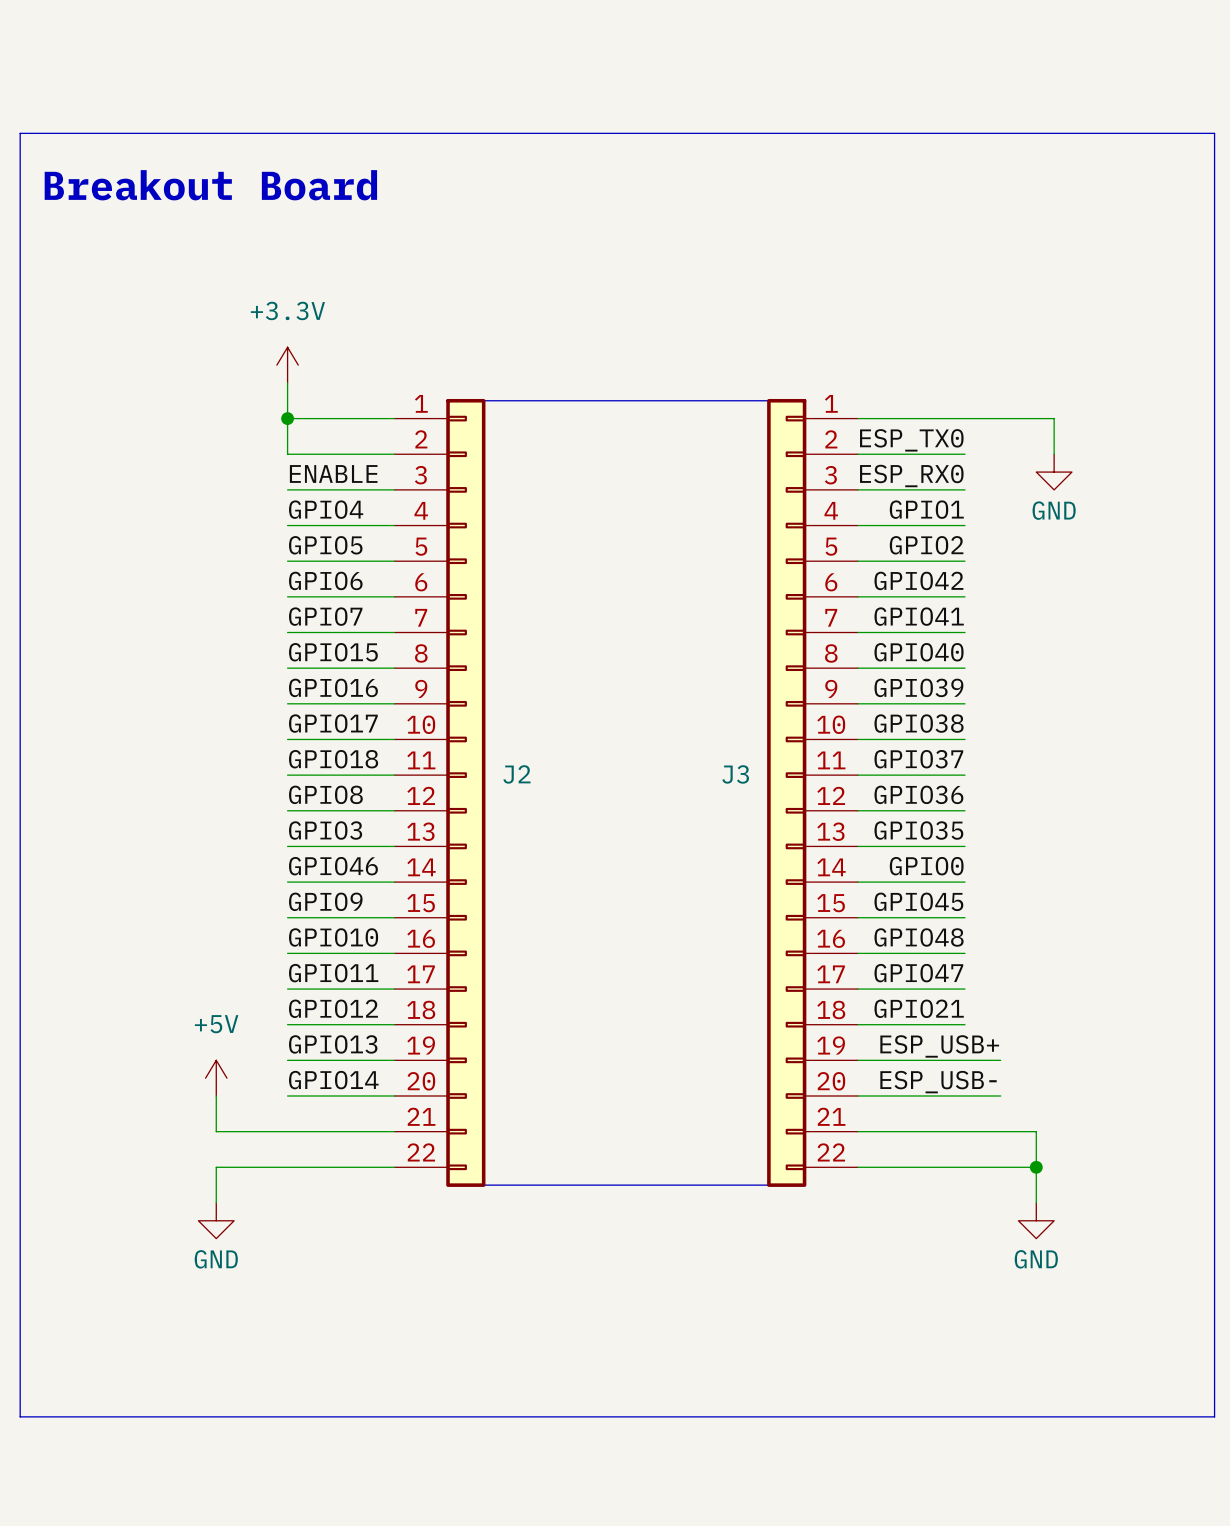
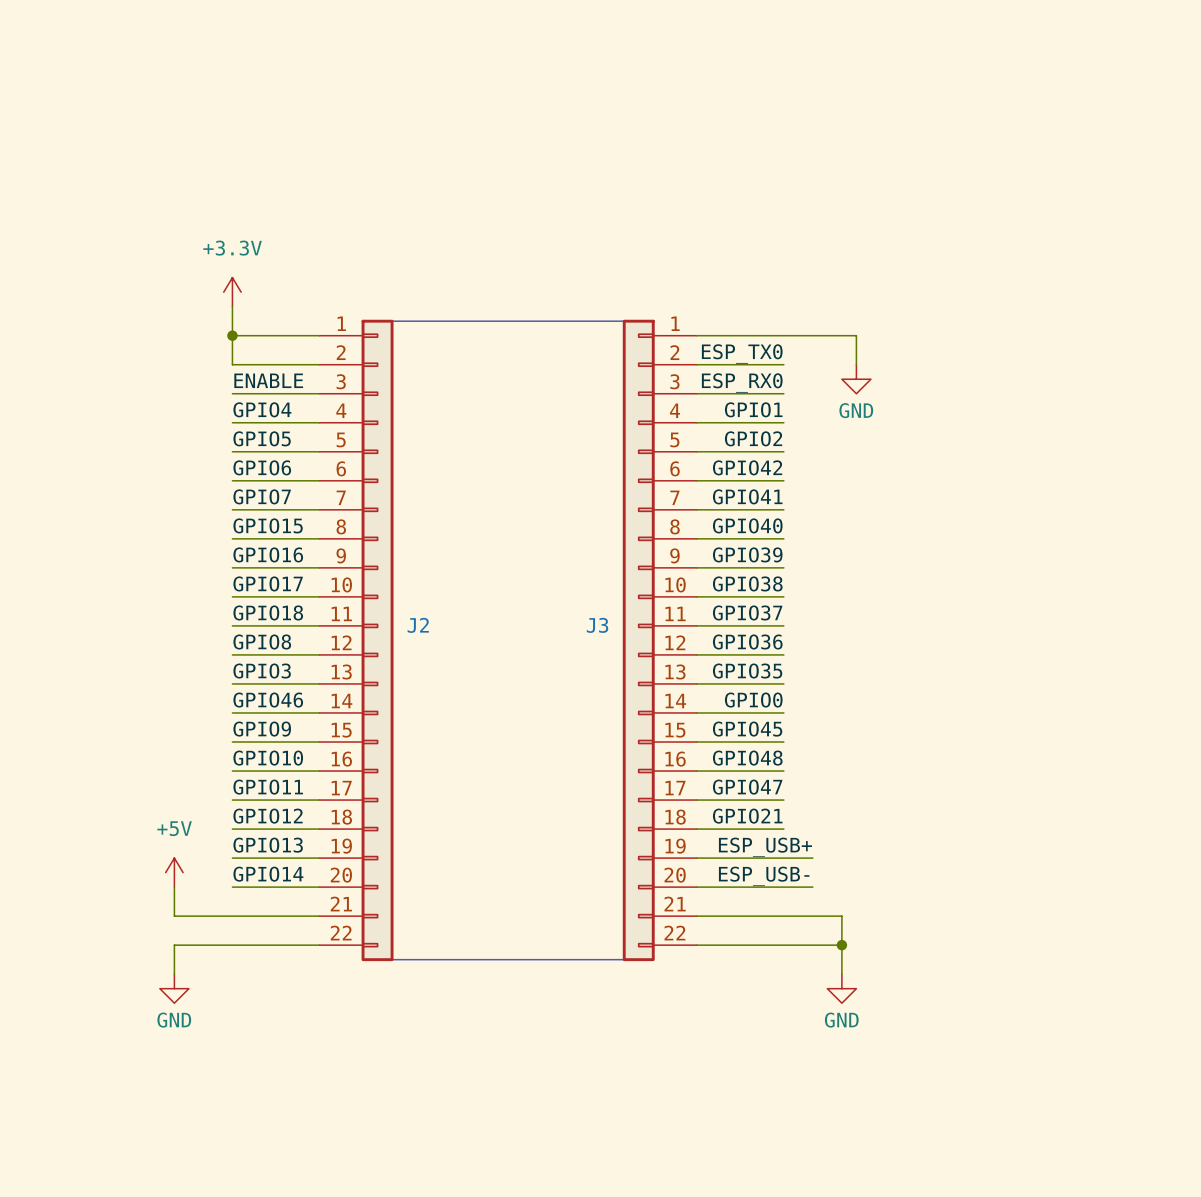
line: (20, 133) (1214, 133) (1214, 1416) (20, 1416) (20, 133) -> none
text: Breakout Board (210, 185) -> none

